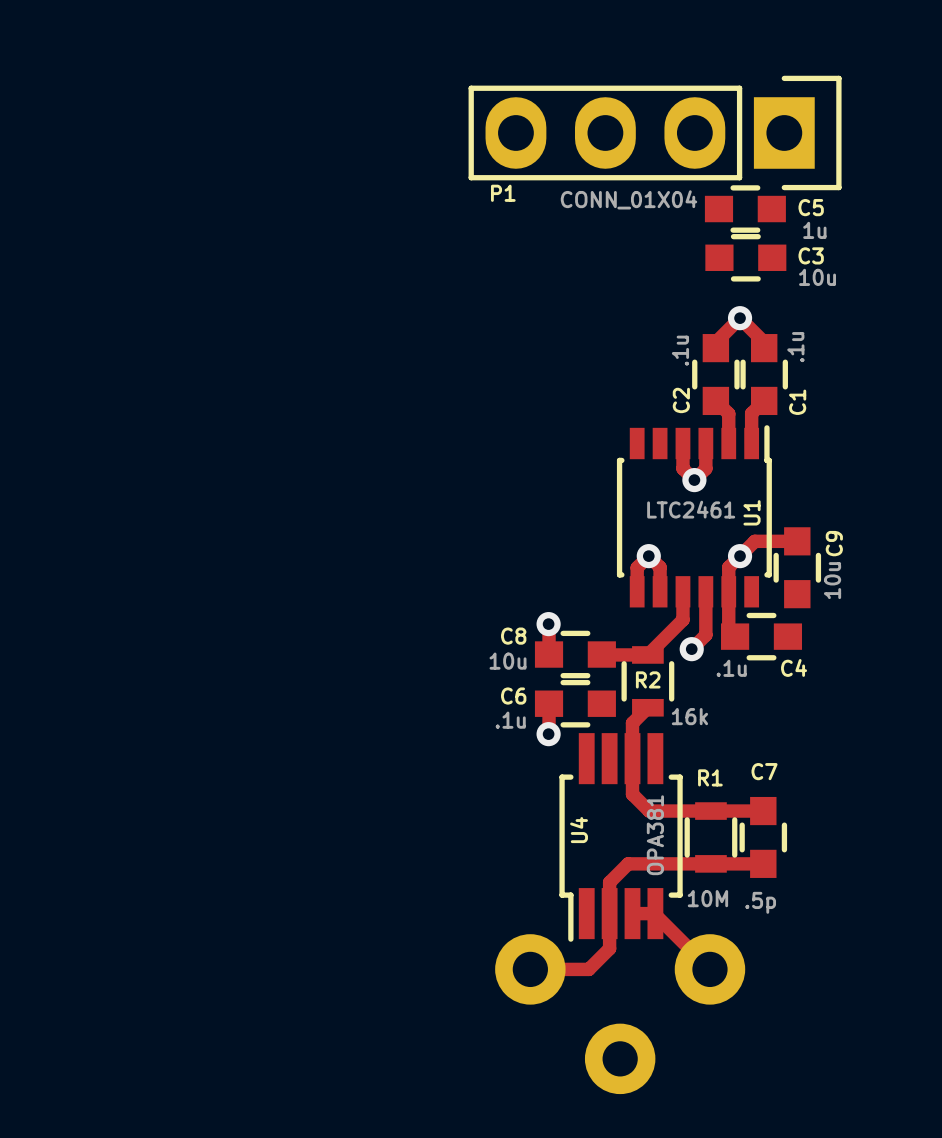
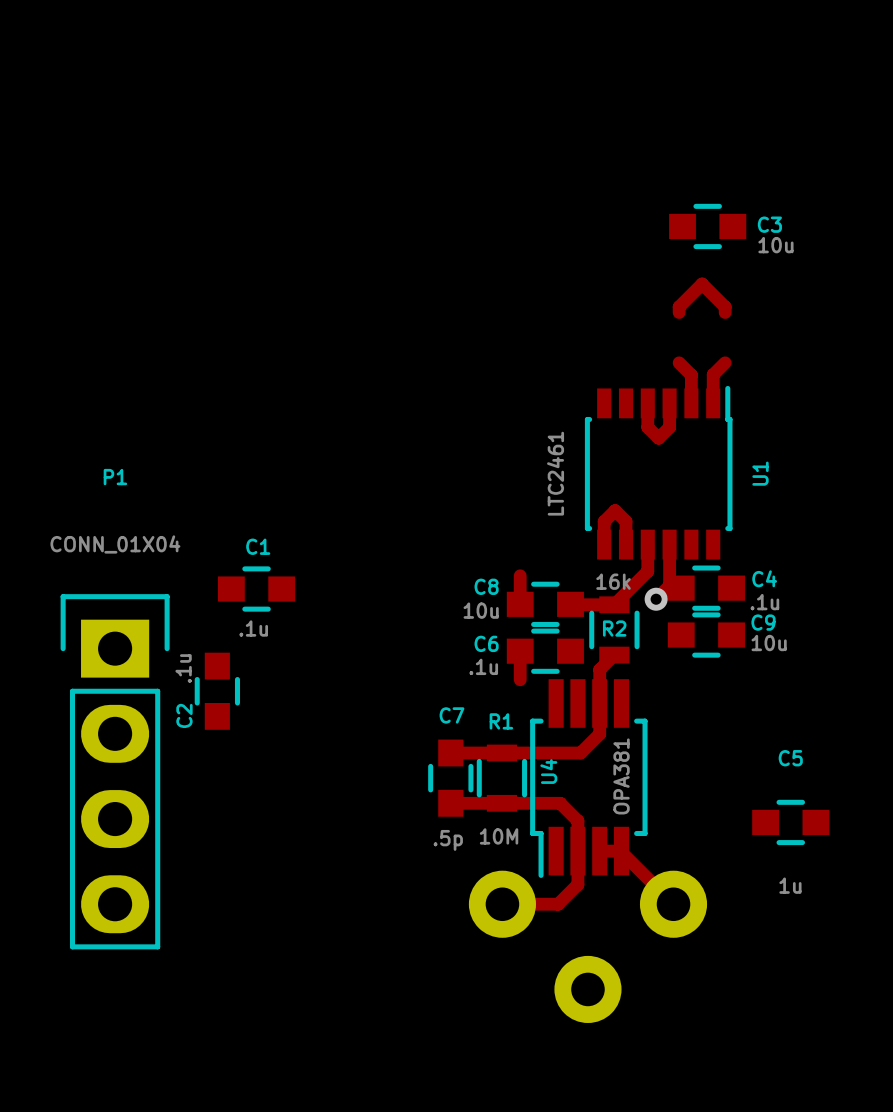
P1 rotation: 0° (655, 132) -> 90° counterclockwise (115, 771)
P1 position: (655, 132) -> (115, 771)
P1 name position: P1 (503, 193) -> P1 (115, 477)
P1 value position: CONN_01X04 (629, 199) -> CONN_01X04 (115, 544)
C5 name position: C5 (811, 207) -> C5 (790, 758)
C5 position: (745, 209) -> (790, 822)
C5 value position: 1u (814, 230) -> 1u (790, 885)
via: (740, 318) -> none
C2 position: (715, 374) -> (217, 691)
C1 rotation: 0° (764, 374) -> 90° clockwise (256, 589)
C1 position: (764, 374) -> (256, 589)
C1 name position: C1 (797, 402) -> C1 (258, 546)
via: (694, 480) -> none
U1 value rotation: 0° (691, 509) -> 90° counterclockwise (555, 473)
U1 name position: U1 (752, 512) -> U1 (760, 473)
top track: (797, 541) (754, 541) (728, 567) (728, 630) -> none
via: (648, 556) -> none
via: (740, 556) -> none
C9 rotation: 0° (797, 567) -> 90° clockwise (706, 635)
C9 position: (797, 567) -> (706, 635)
via: (548, 624) -> none
C4 position: (761, 636) -> (706, 588)
C4 name position: C4 (794, 667) -> C4 (764, 578)
C4 value position: .1u (731, 668) -> .1u (764, 602)
R2 value position: 16k (689, 716) -> 16k (613, 581)
via: (548, 734) -> none
top track: (632, 790) (632, 794) (649, 811) (763, 811) -> (599, 734) (580, 752) (450, 752)
R1 position: (710, 837) -> (501, 778)
C7 position: (763, 837) -> (450, 778)
top track: (763, 863) (628, 863) (609, 882) -> (450, 803) (560, 803) (577, 820)

